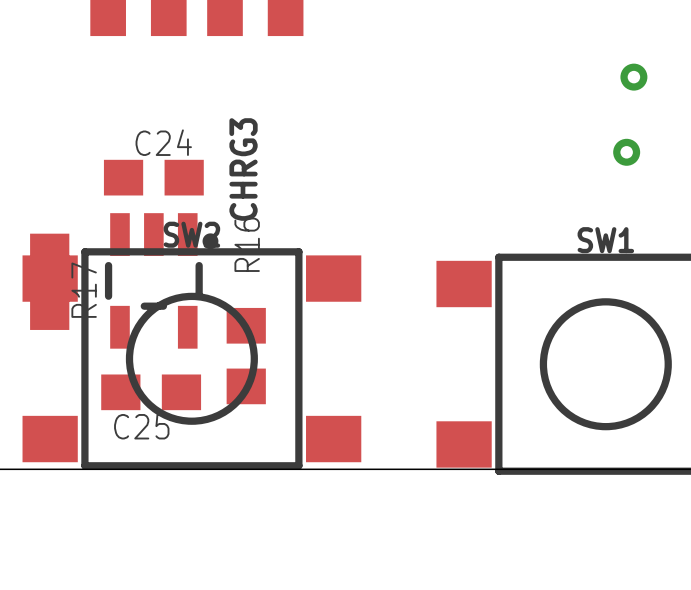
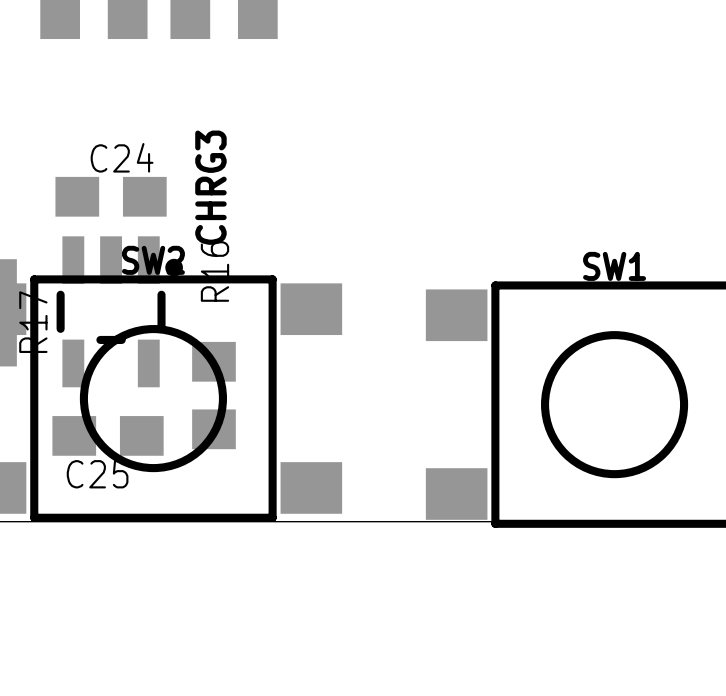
via: (633, 77) -> none
via: (626, 152) -> none

